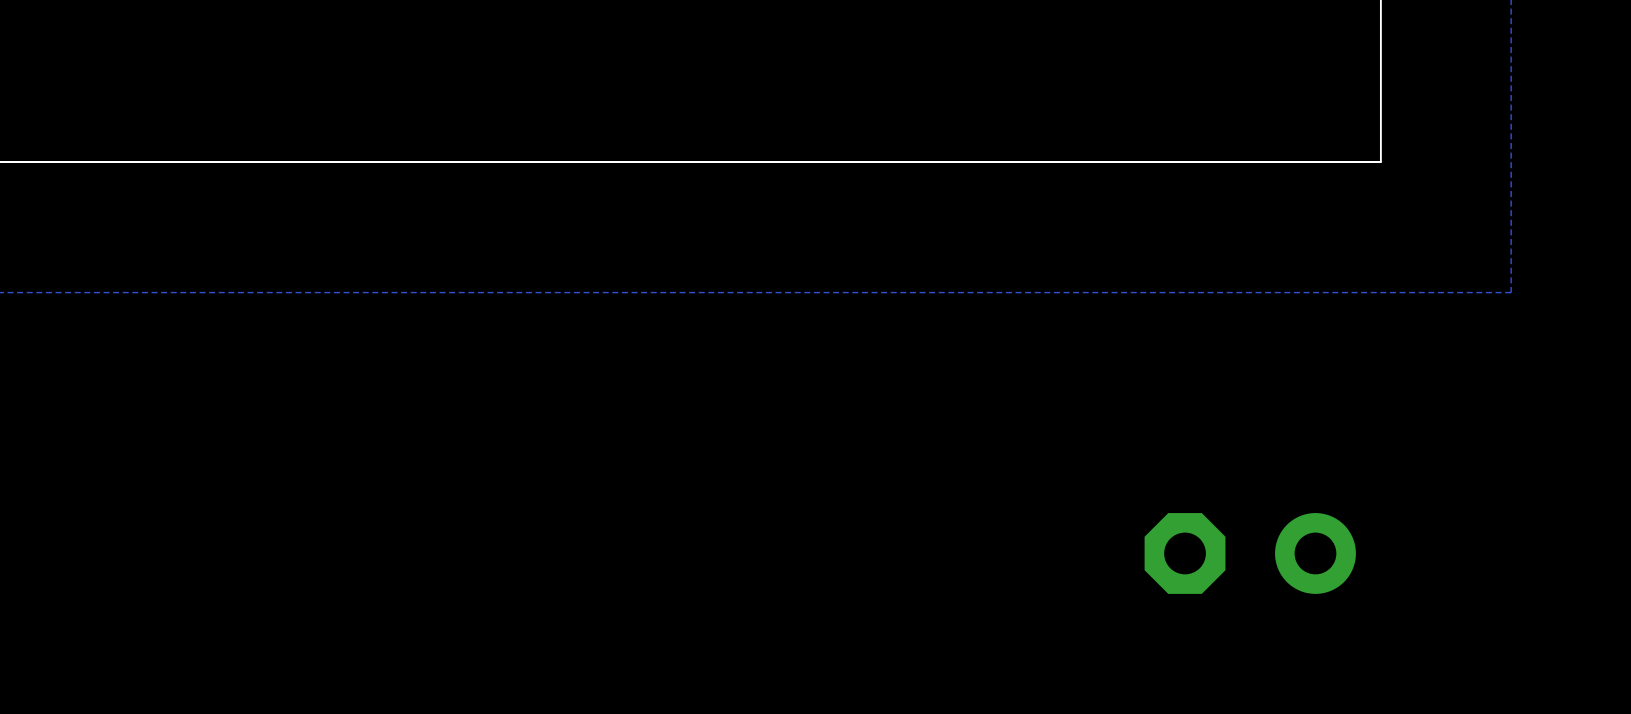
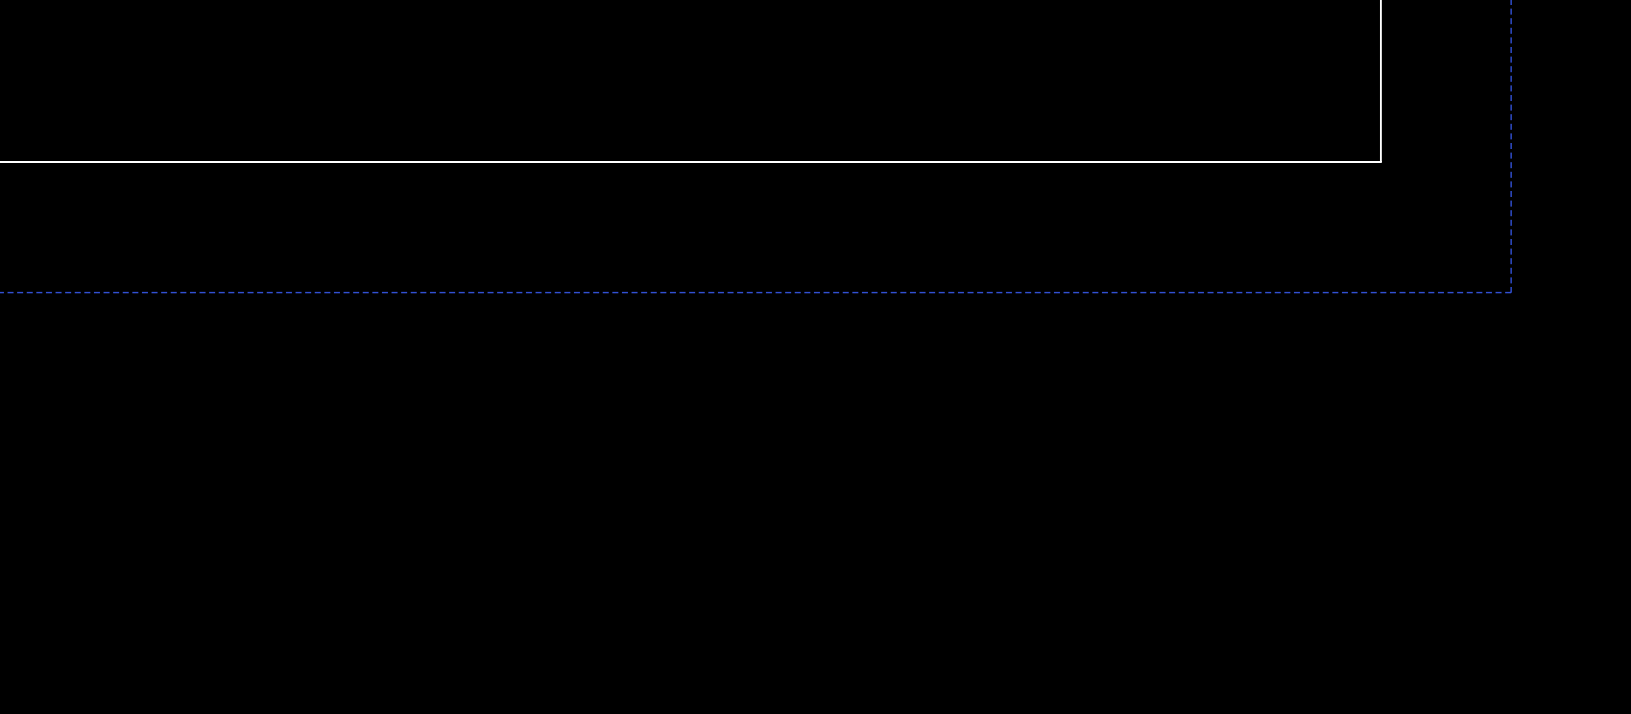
part: (1250, 553) -> none

